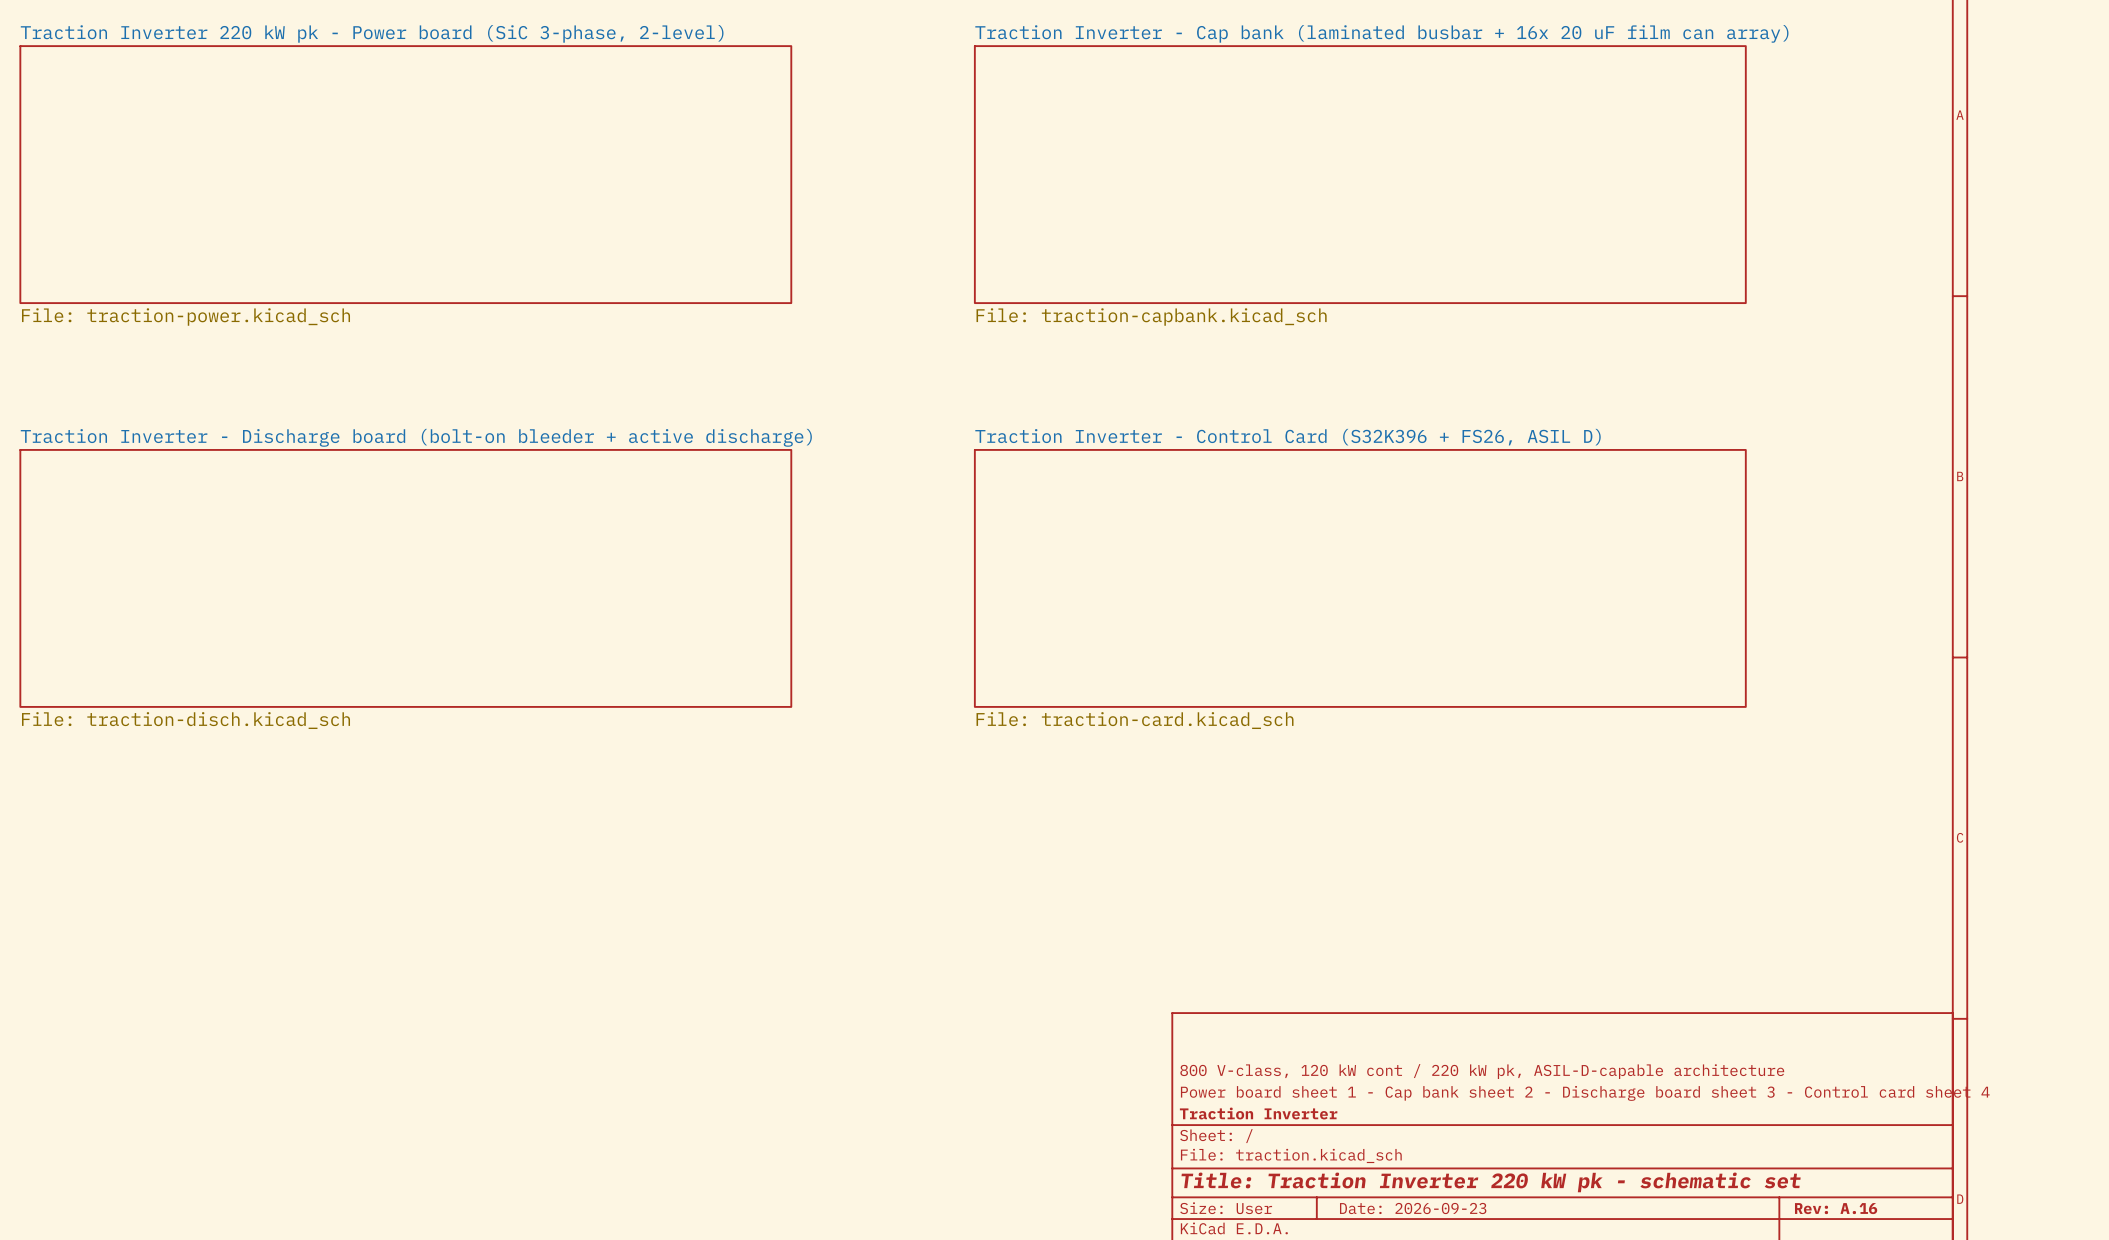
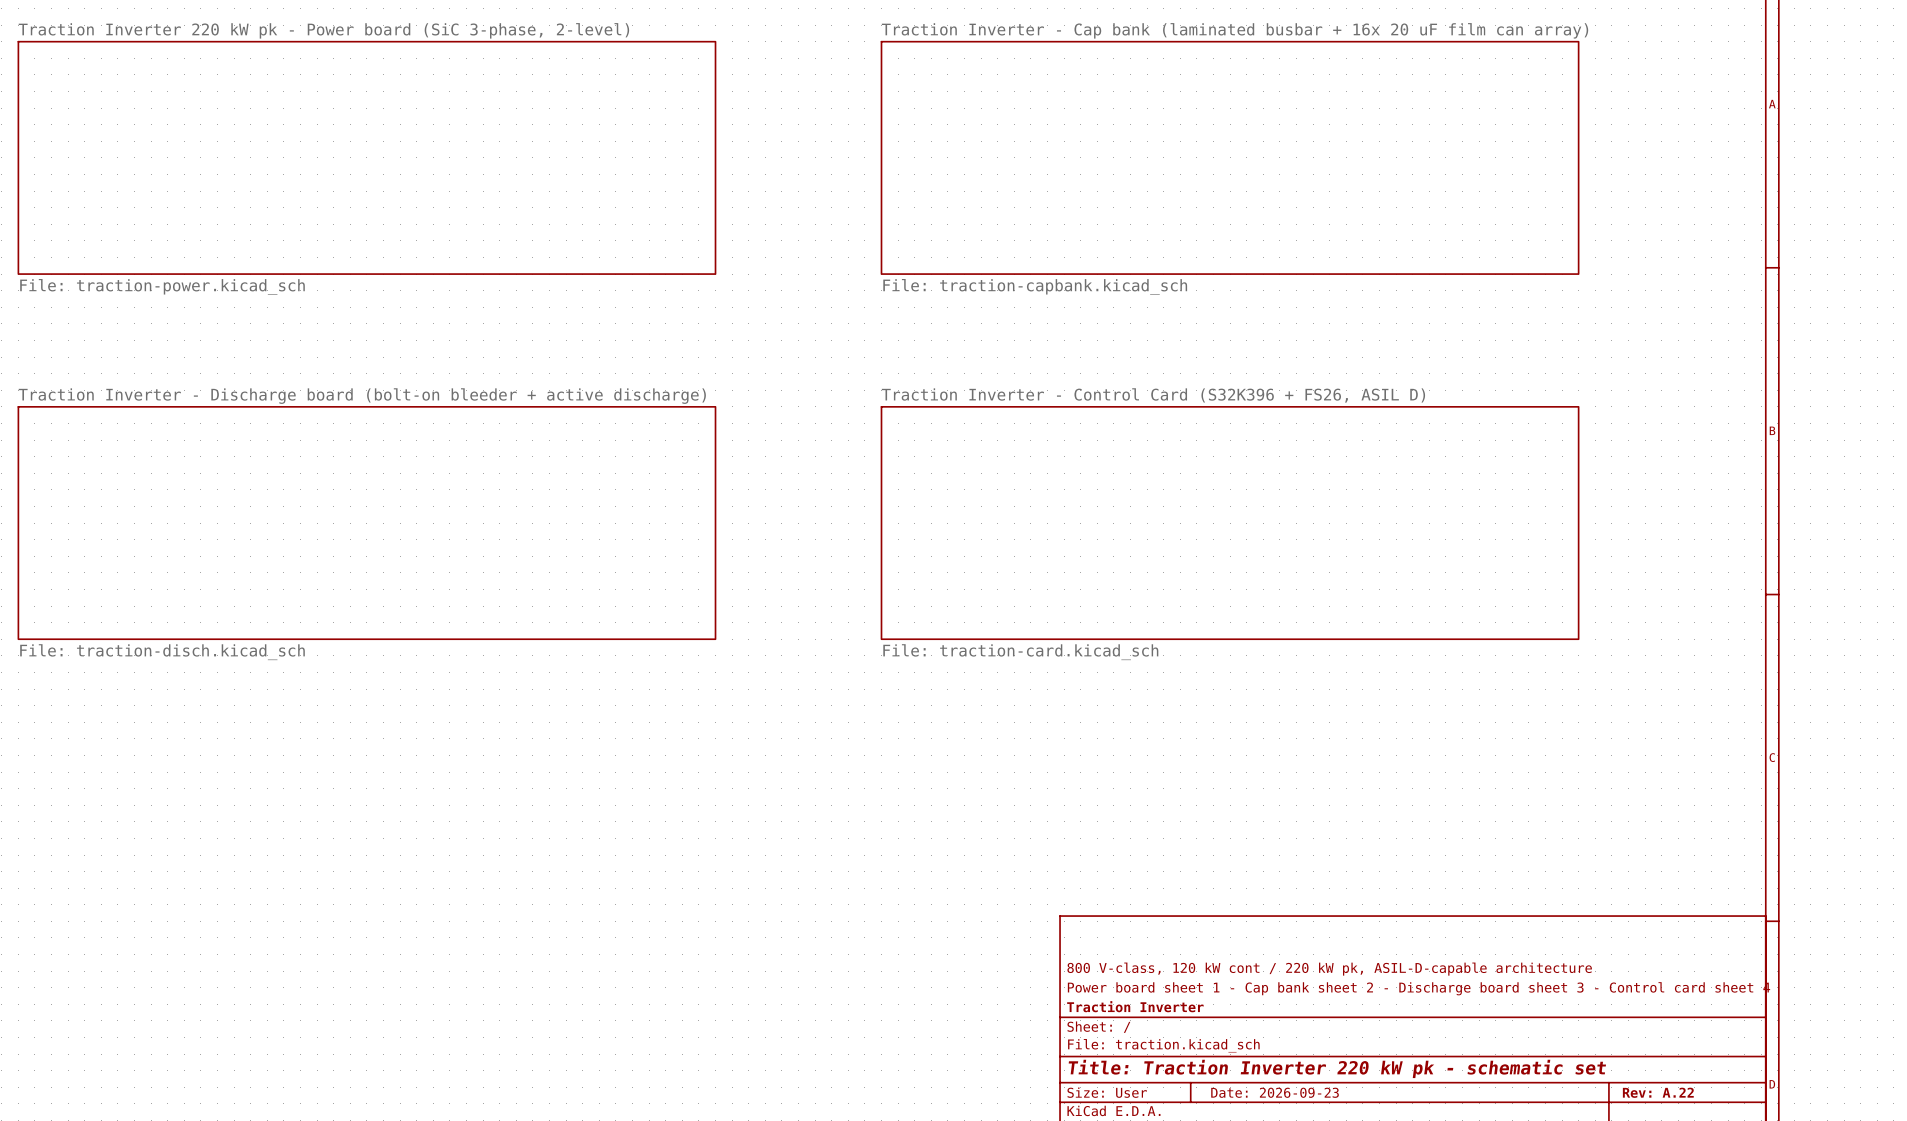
title block: Rev: A.16 (1836, 1208) -> Rev: A.22 (1658, 1092)

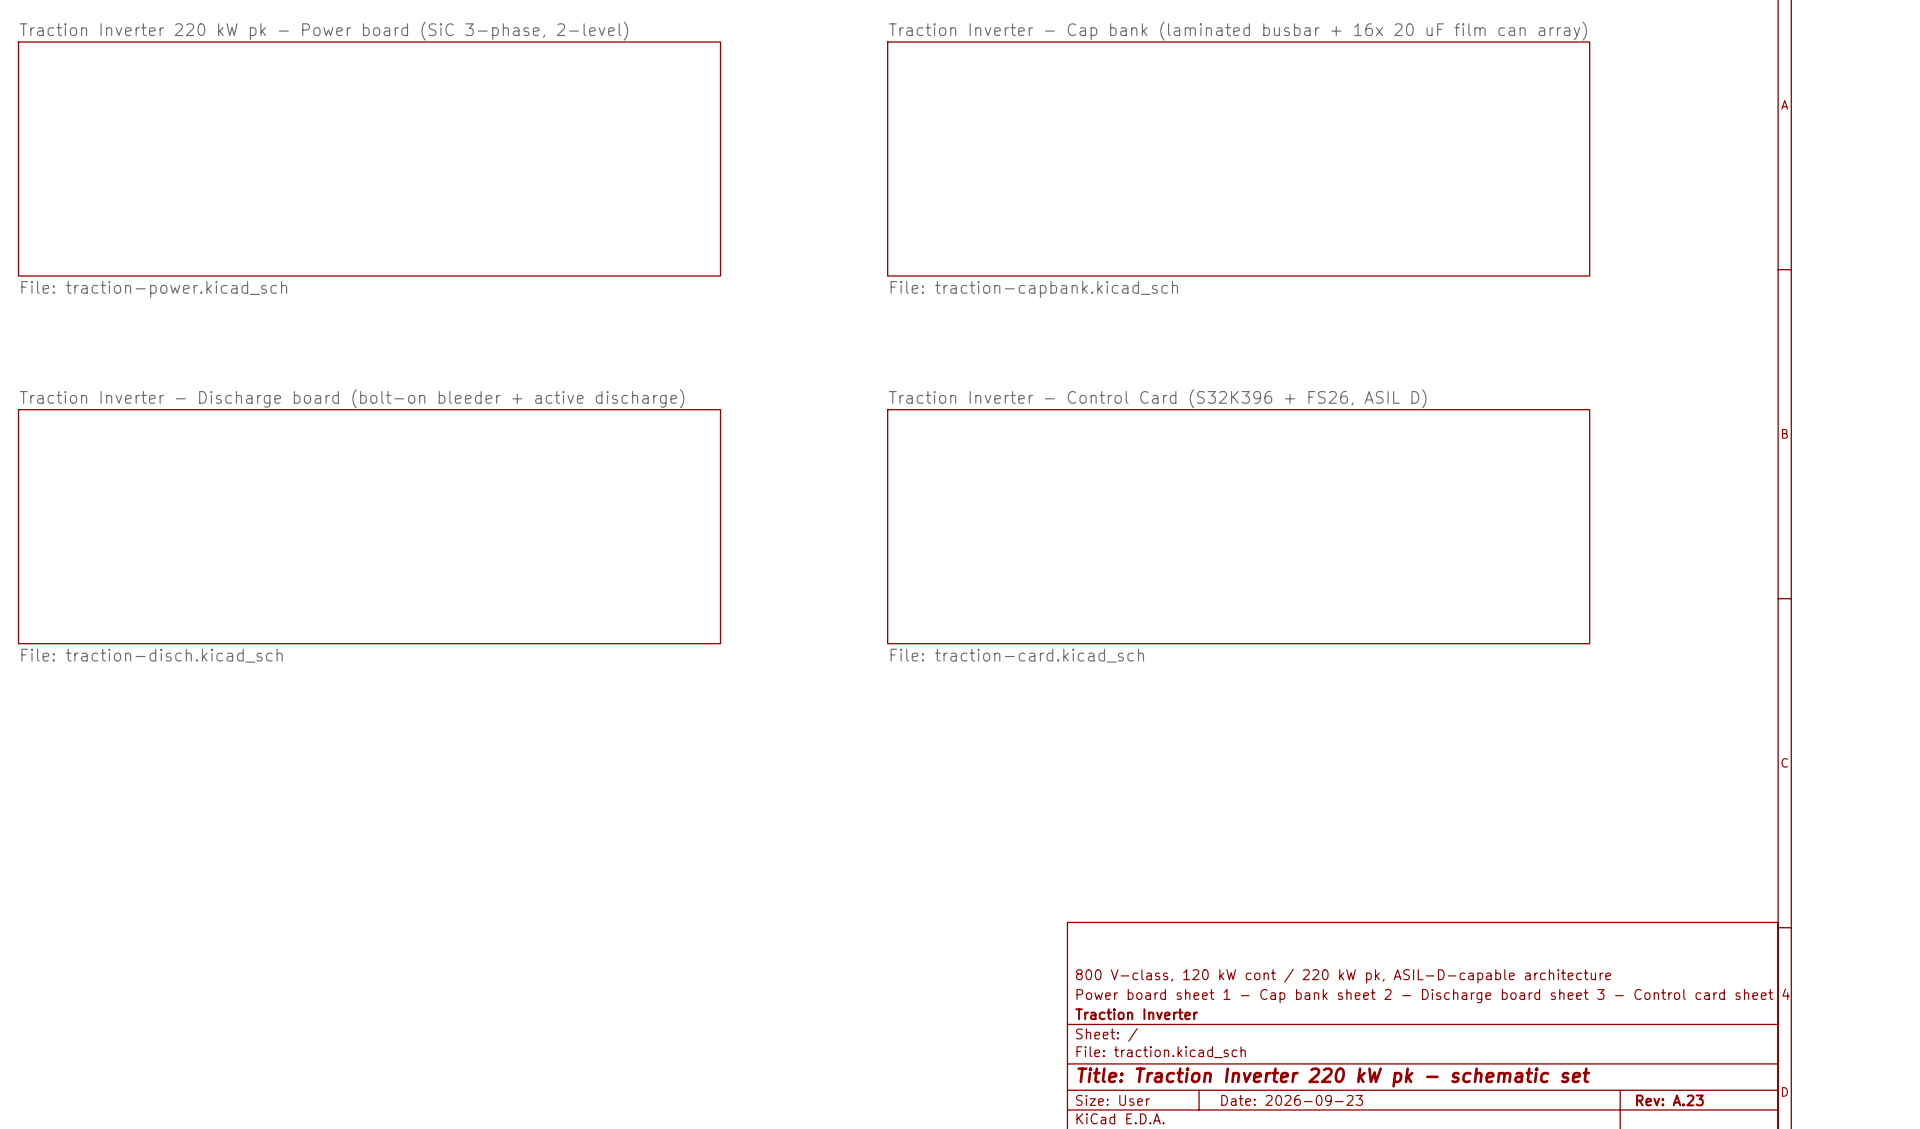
title block: Rev: A.22 (1658, 1092) -> Rev: A.23 (1669, 1100)

